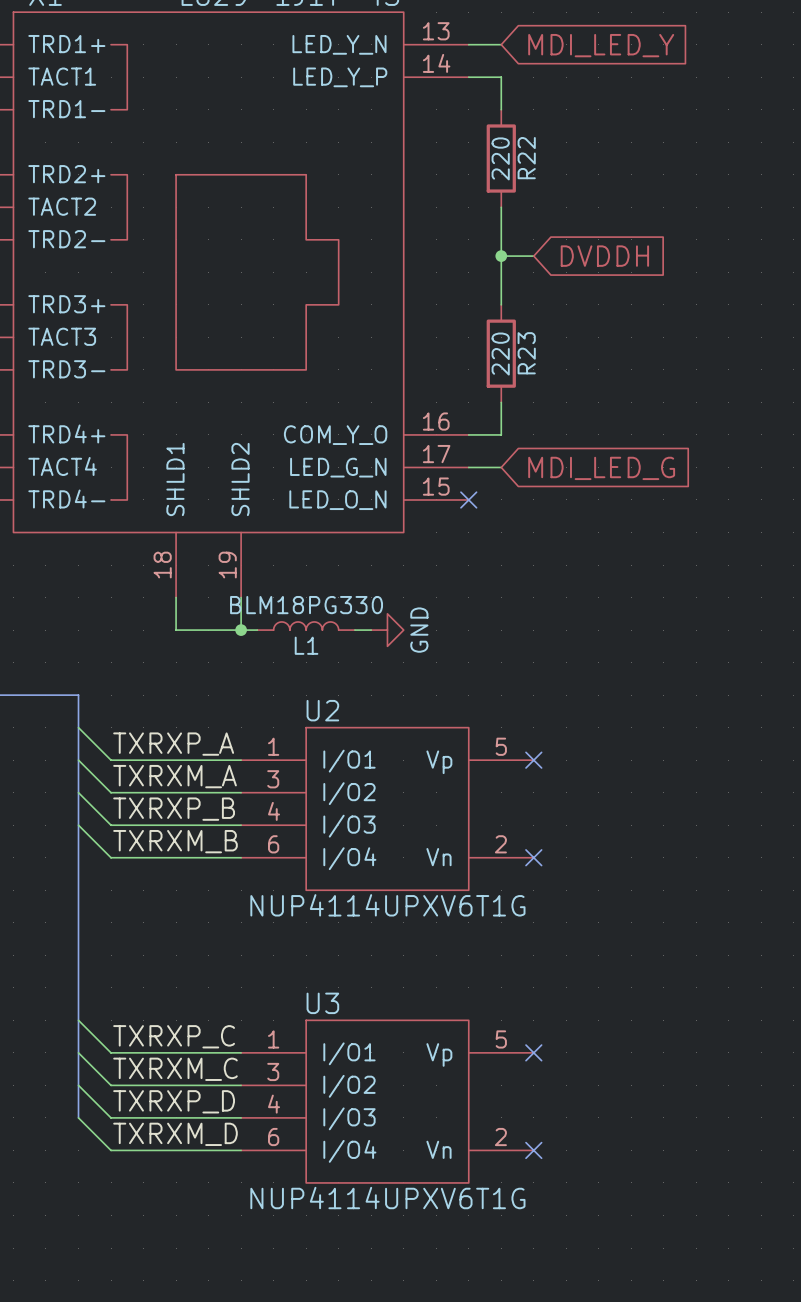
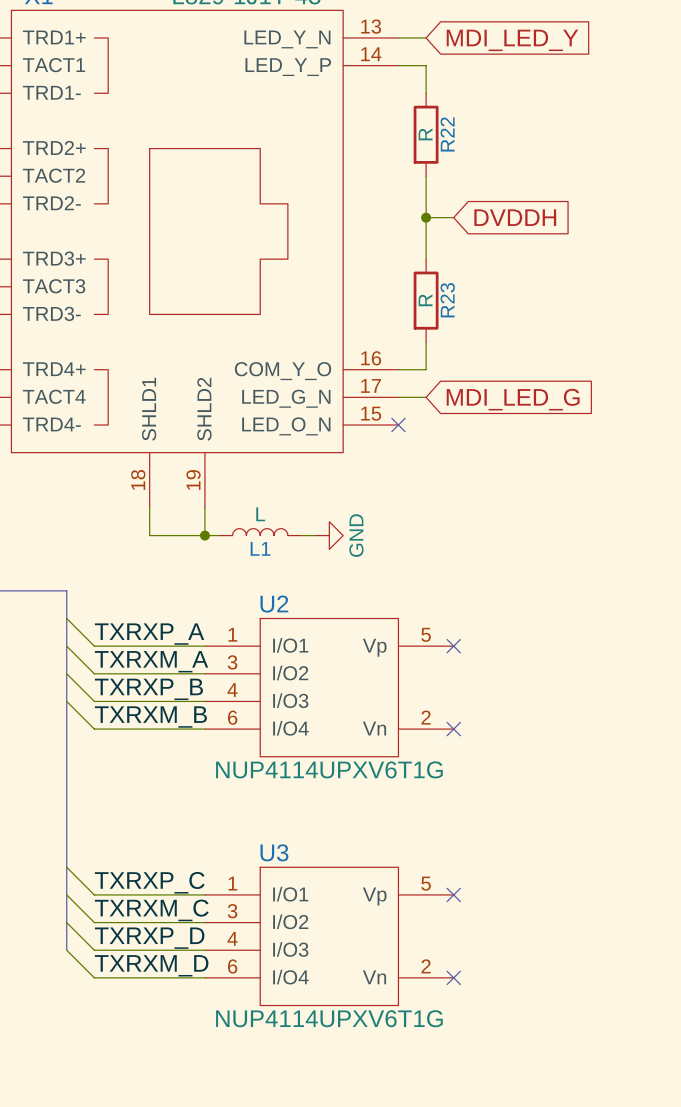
R22 value: 220 (500, 158) -> R (425, 134)
R23 value: 220 (500, 354) -> R (425, 300)
L1 value: BLM18PG330 (306, 605) -> L (260, 514)

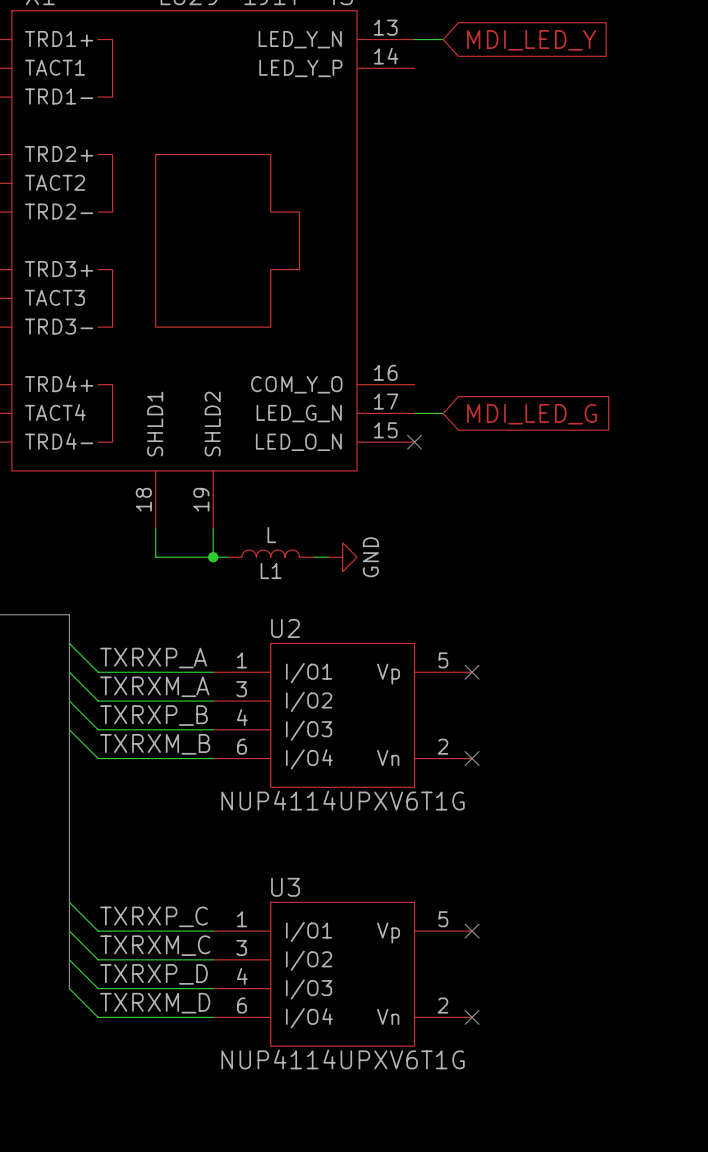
wire: (398, 65) (426, 65) (426, 93) -> none
R22: R (426, 134) -> none
wire: (426, 176) (426, 259) -> none
wire: (426, 217) (453, 217) -> none
junction: (426, 217) -> none
global label: DVDDH (515, 217) -> none
R23: R (426, 300) -> none
wire: (426, 342) (426, 369) (398, 369) -> none

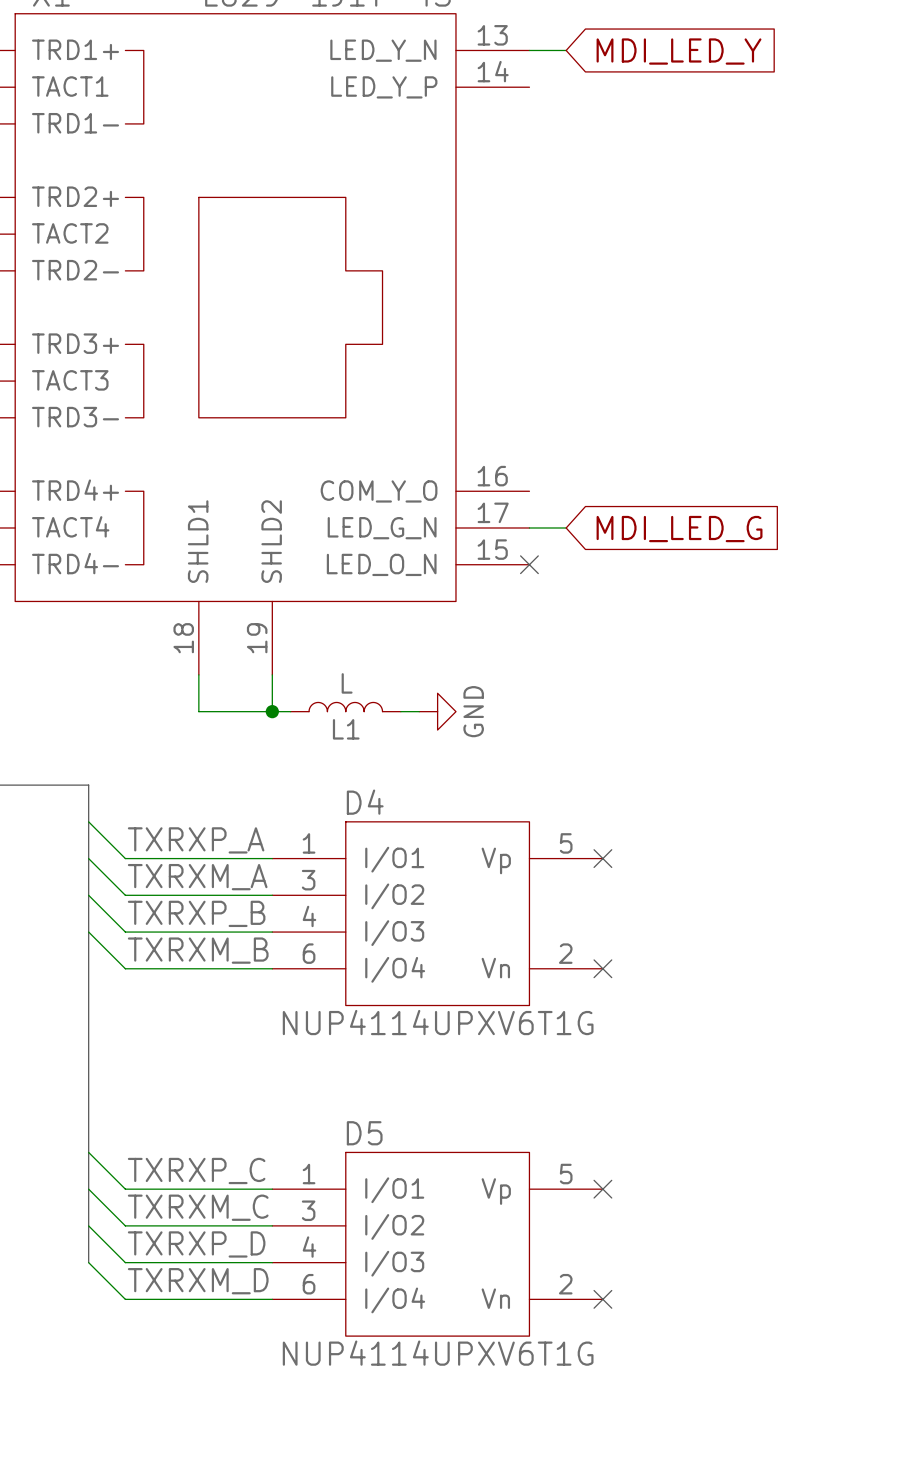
U2 name: U2 (285, 628) -> D4 (365, 802)
U3 name: U3 (285, 887) -> D5 (364, 1133)

